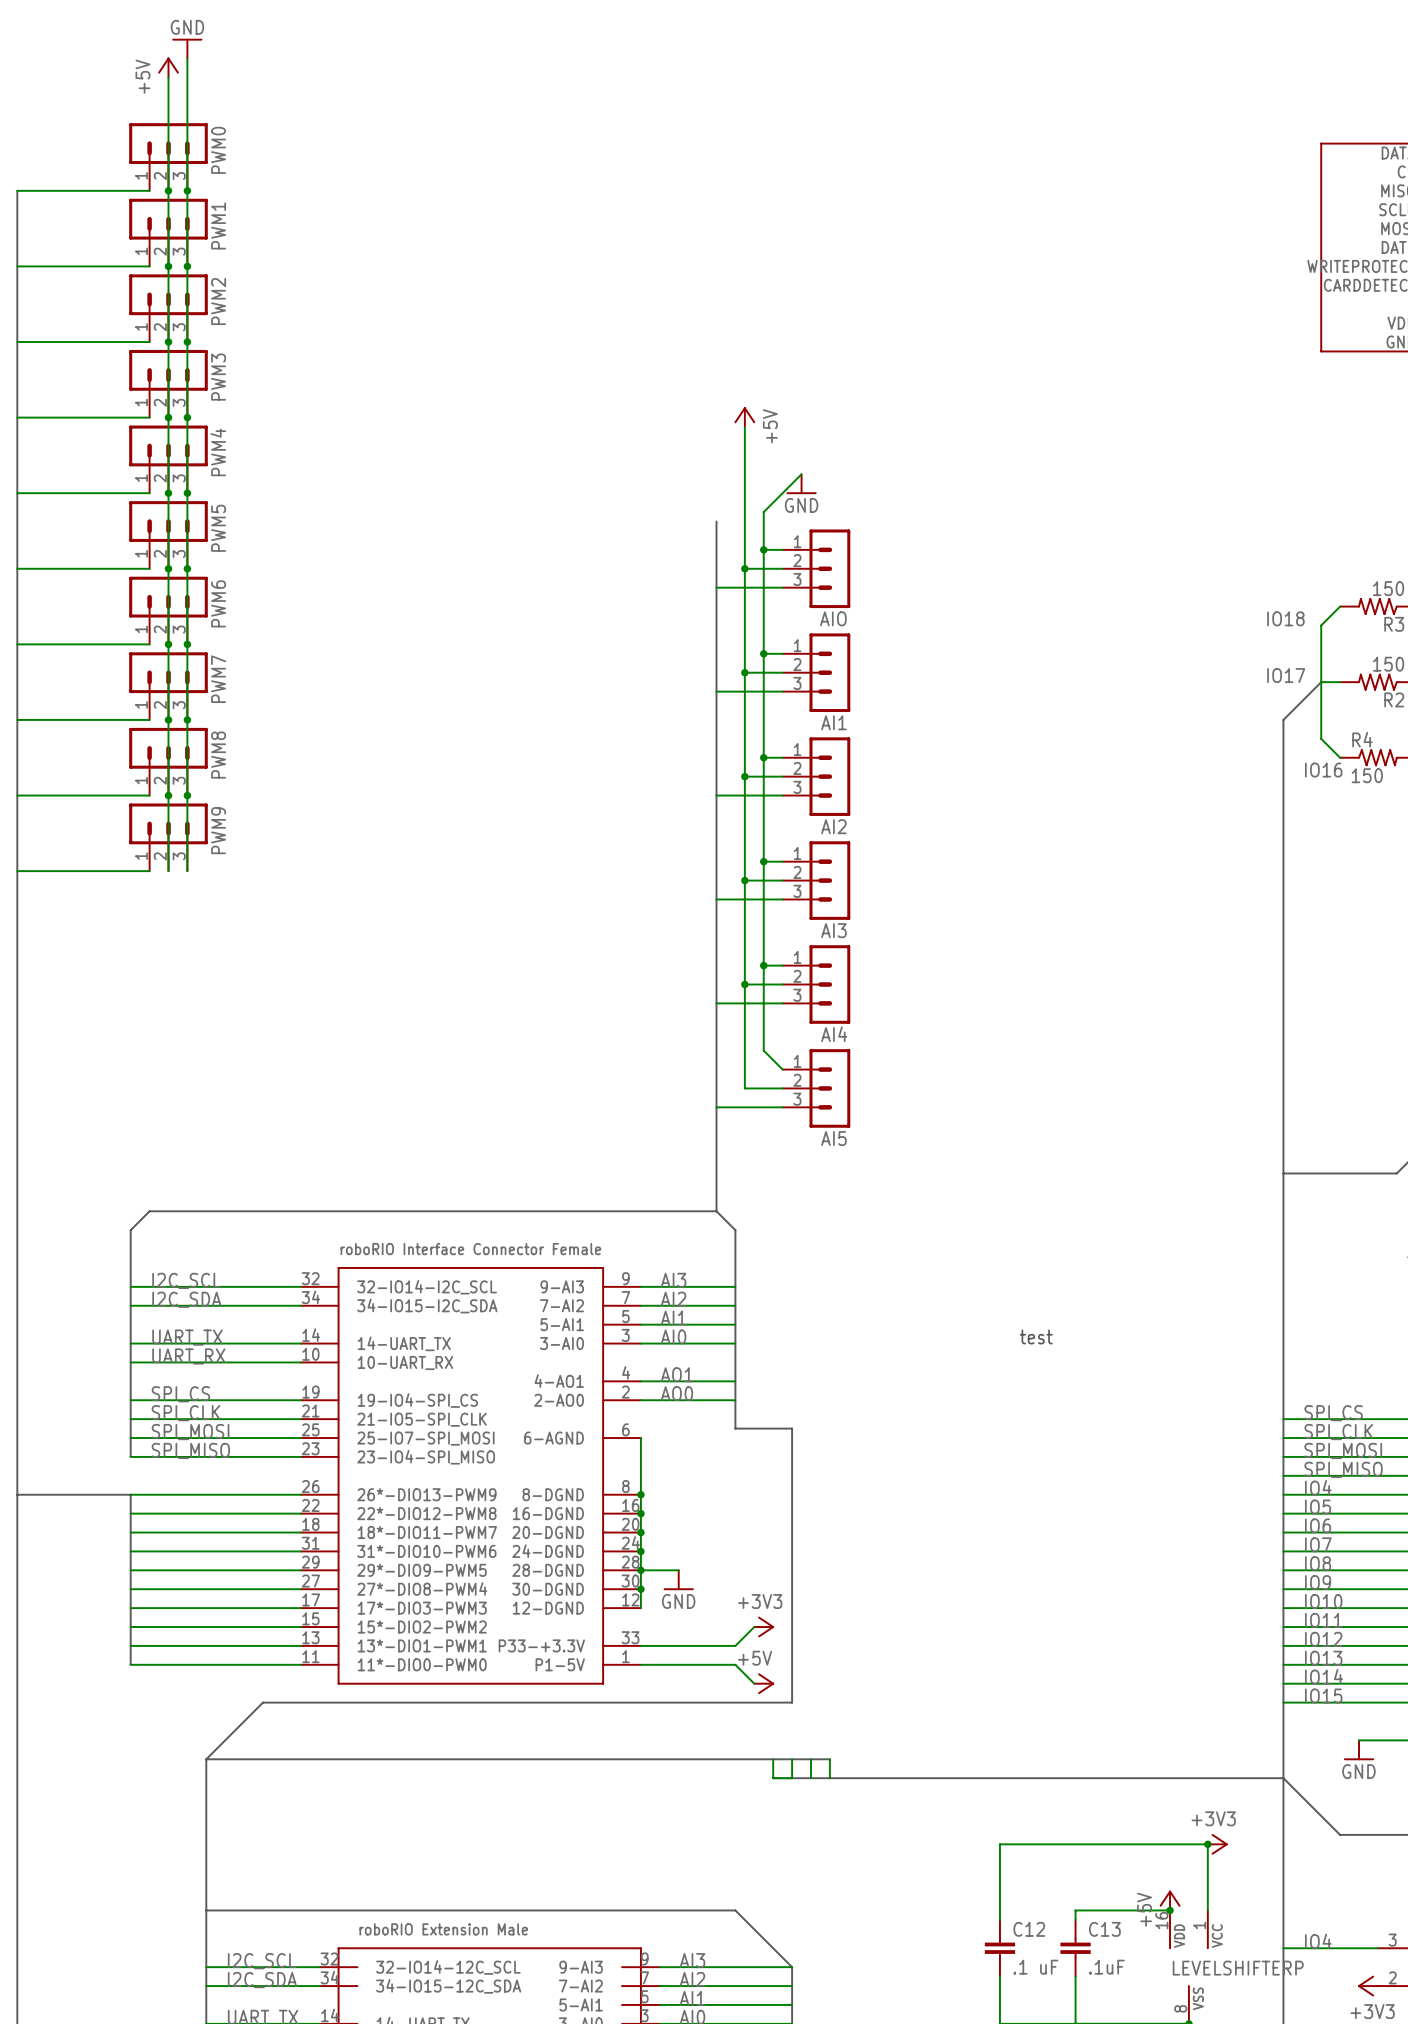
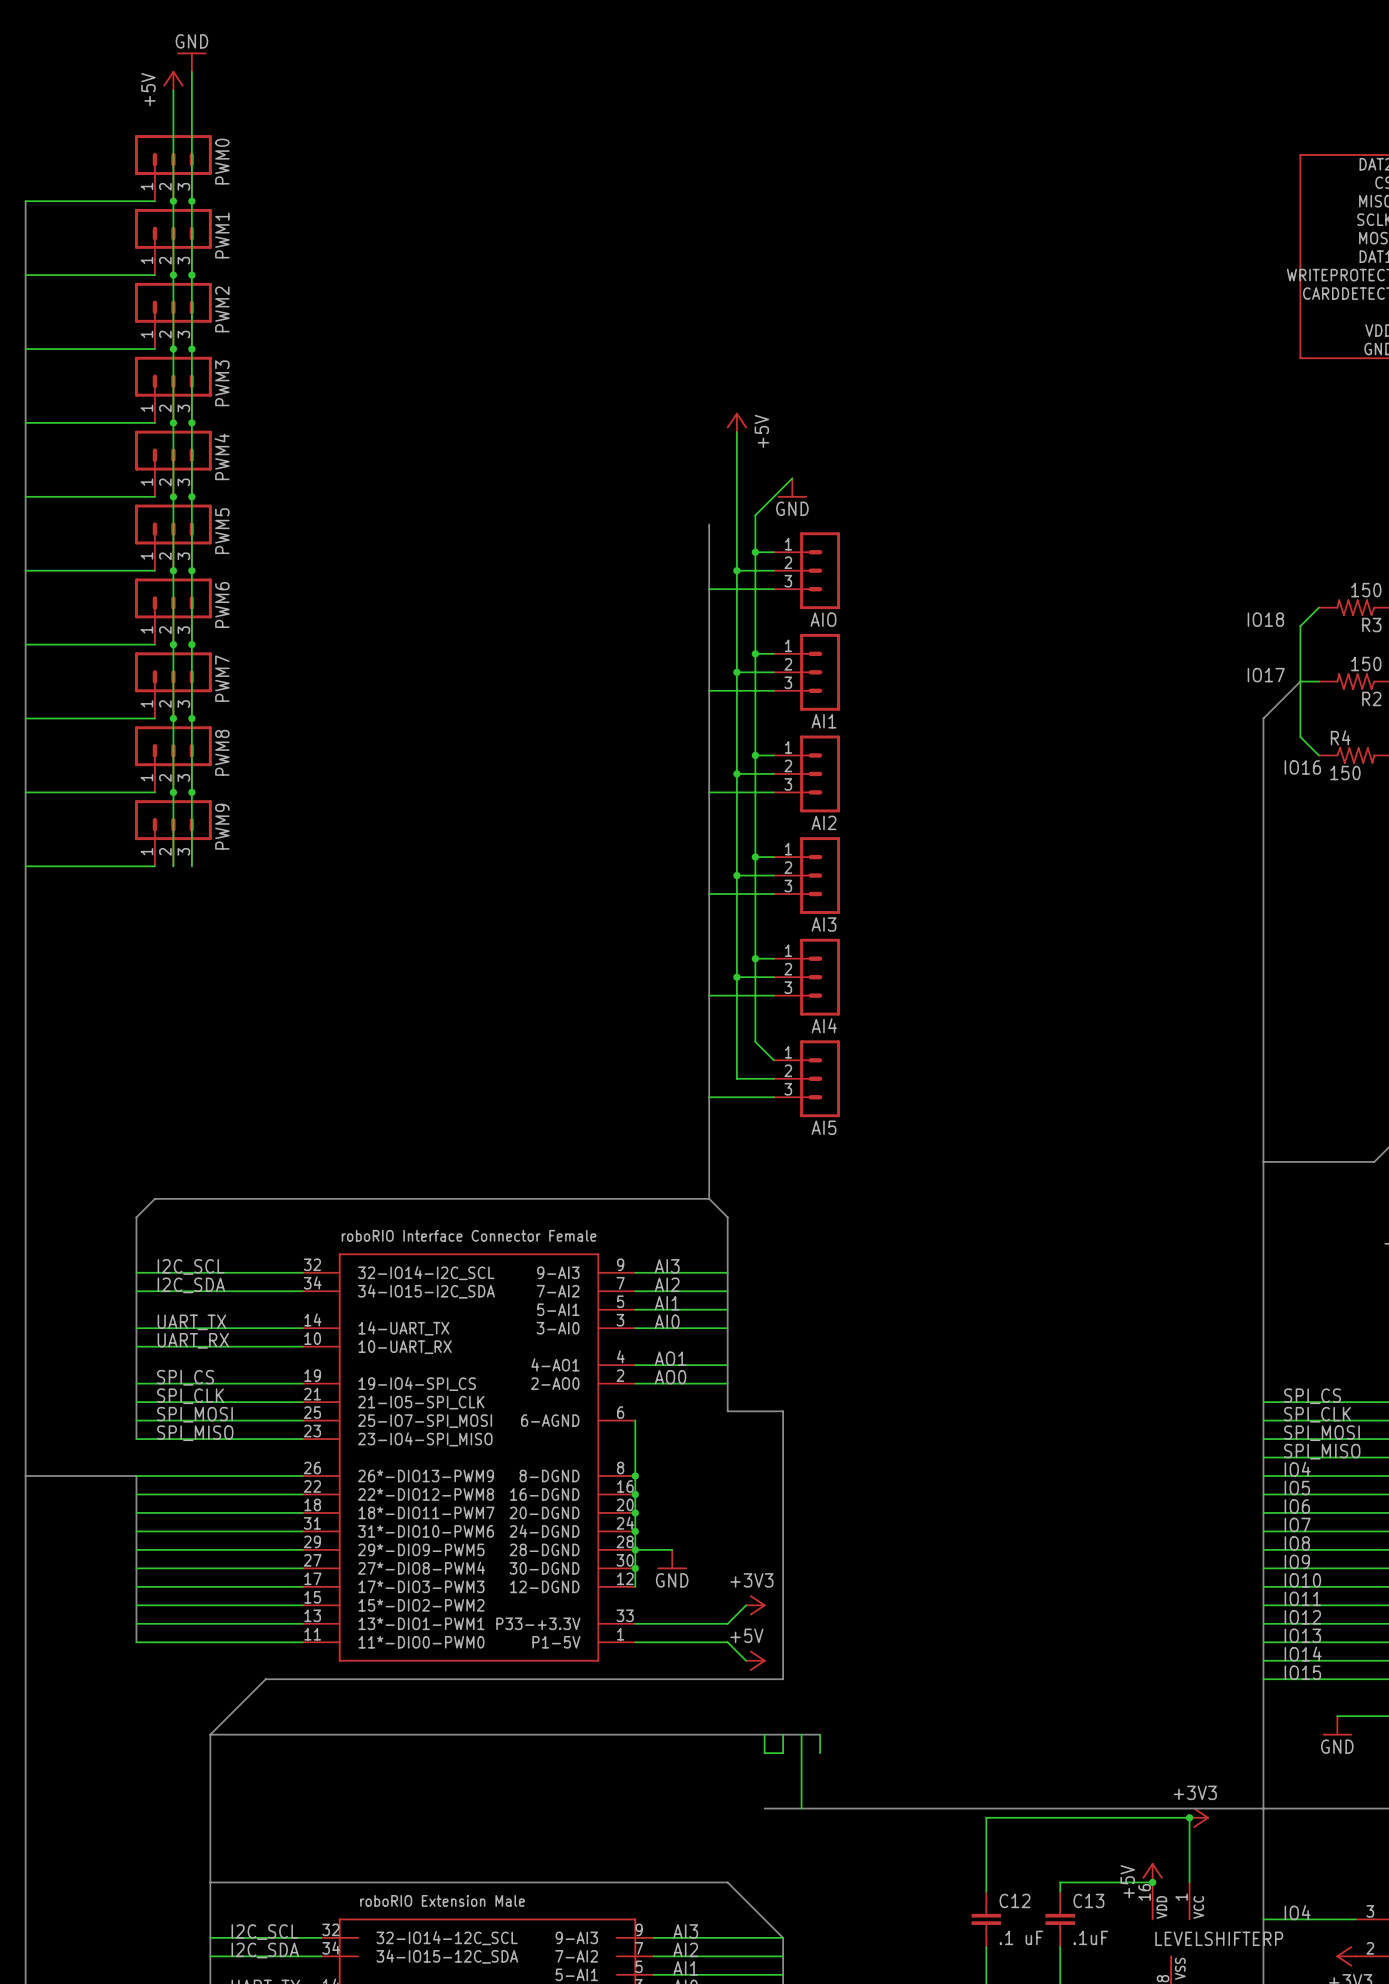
text: test (1036, 1336) -> none
bus: (773, 1778) (1283, 1778) (1340, 1834) -> (764, 1808) (1318, 1808)
wire: none -> (801, 1753) (801, 1808)

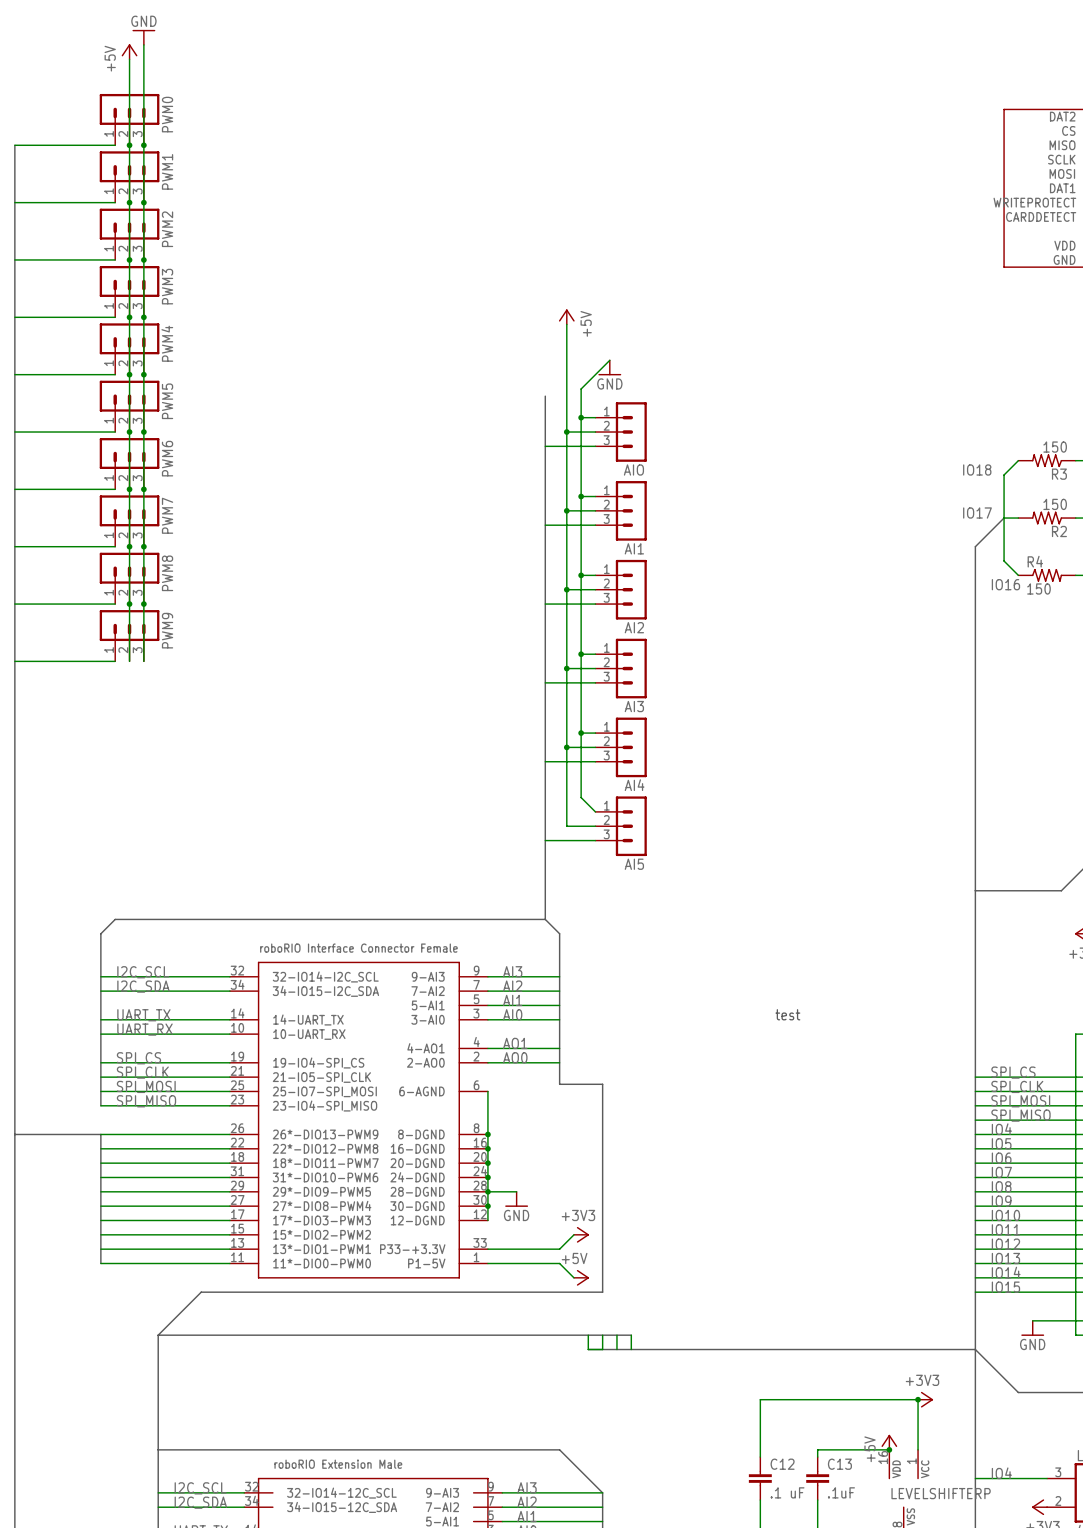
text: none -> test (787, 1014)
wire: (801, 1753) (801, 1808) -> none
bus: (764, 1808) (1318, 1808) -> (588, 1349) (975, 1349) (1018, 1392)

